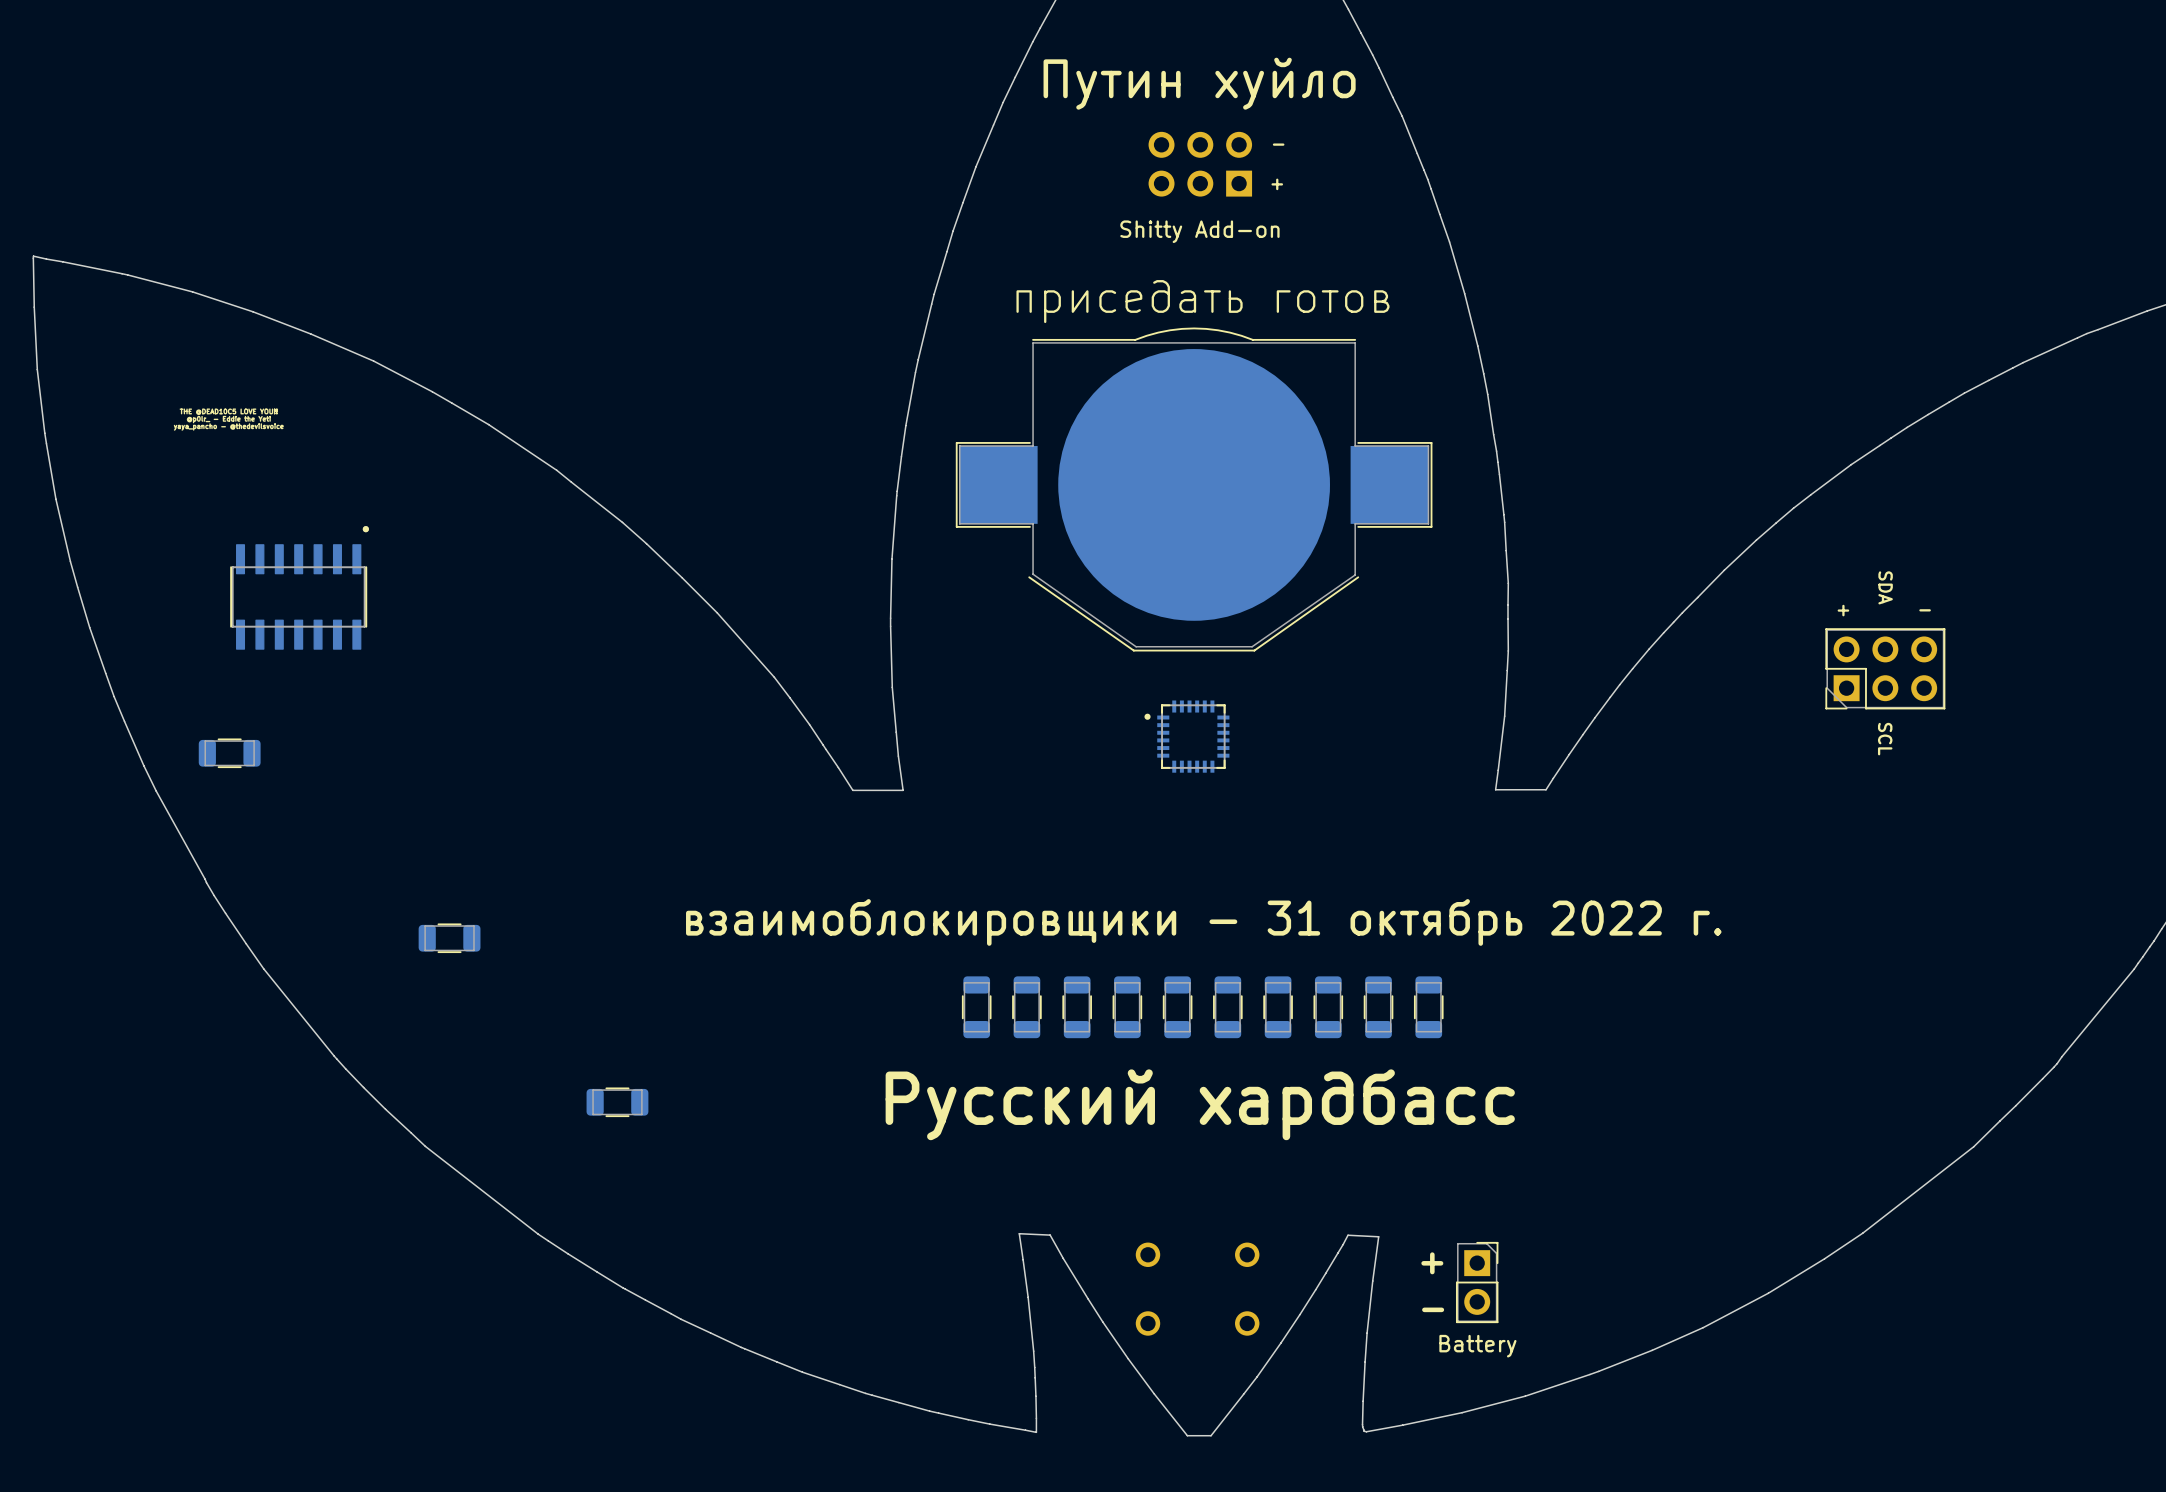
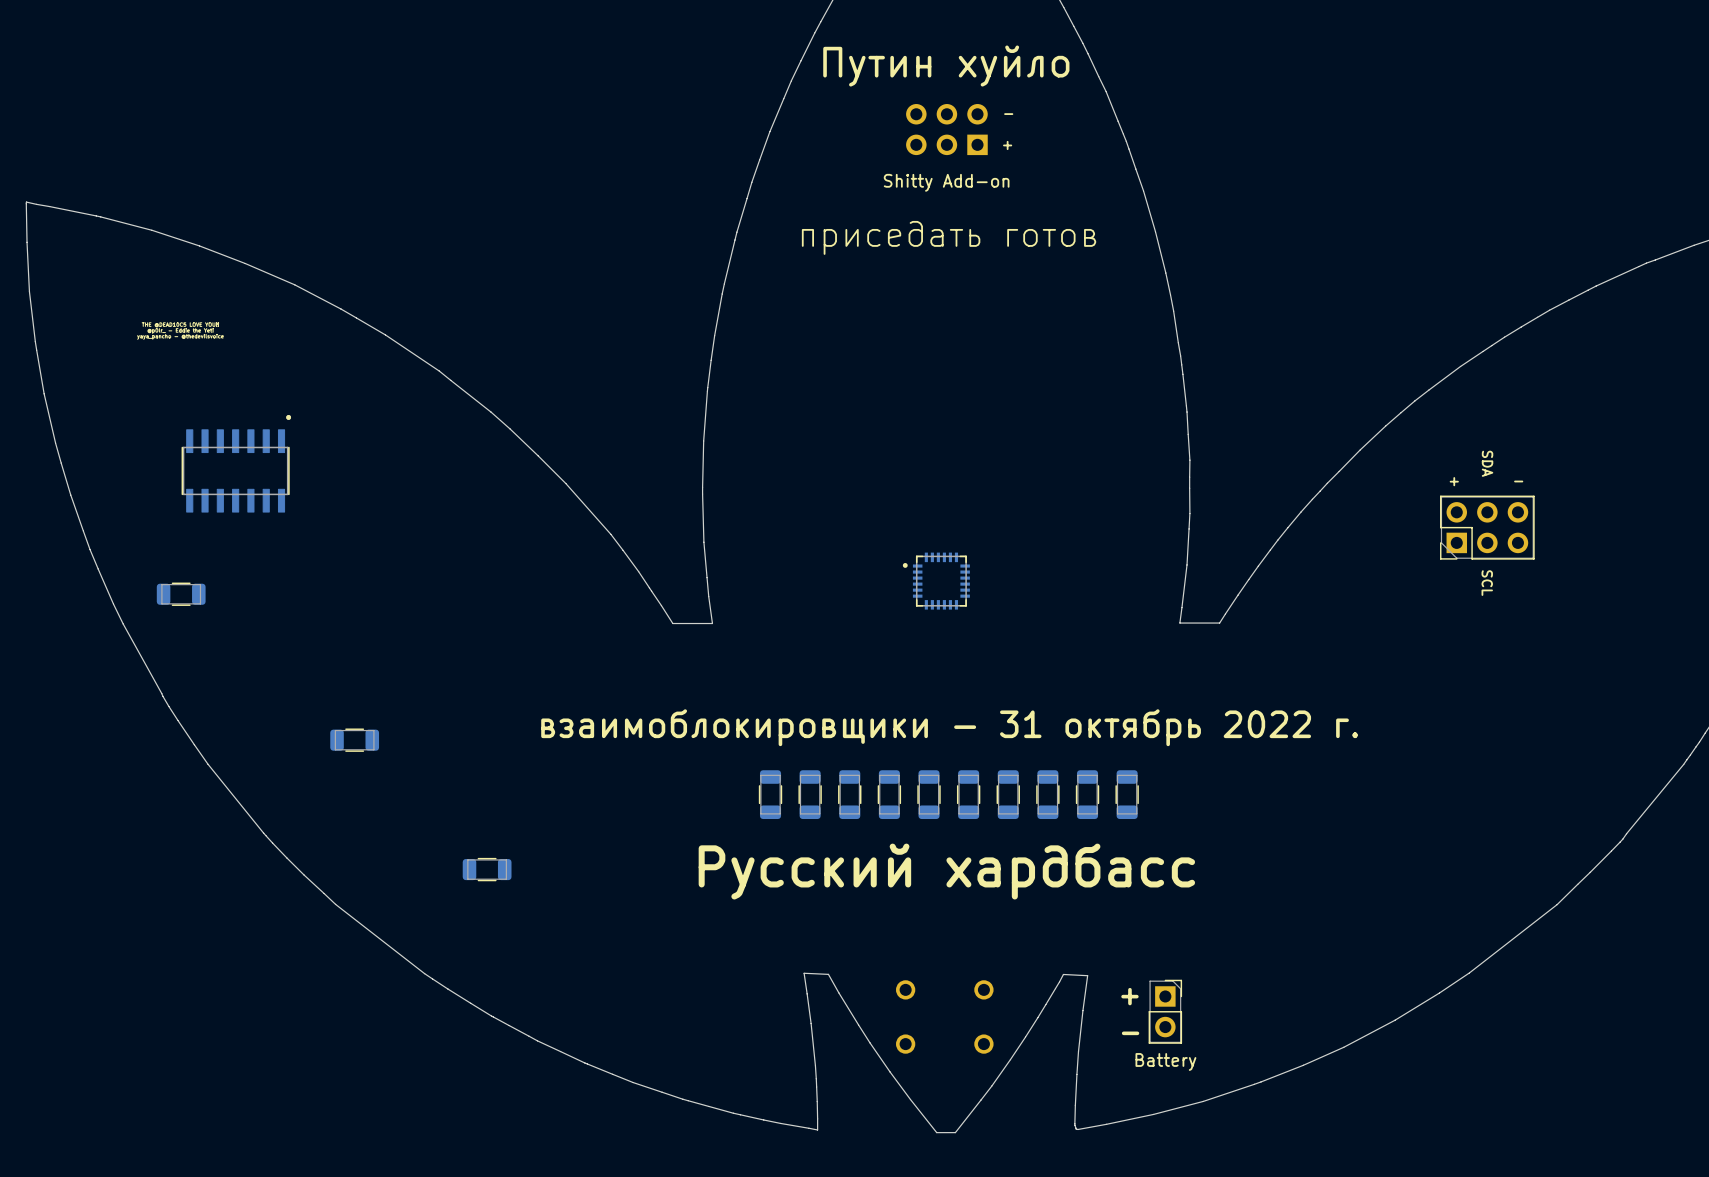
part: (1194, 489) -> none

